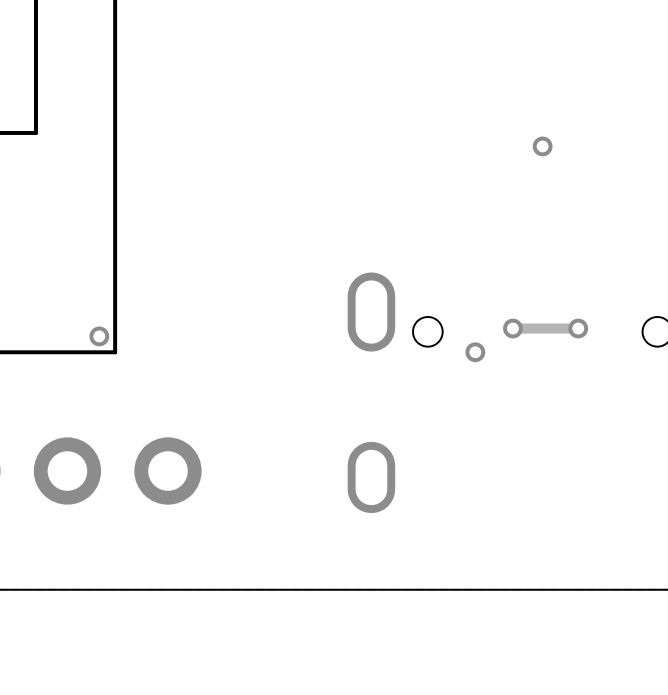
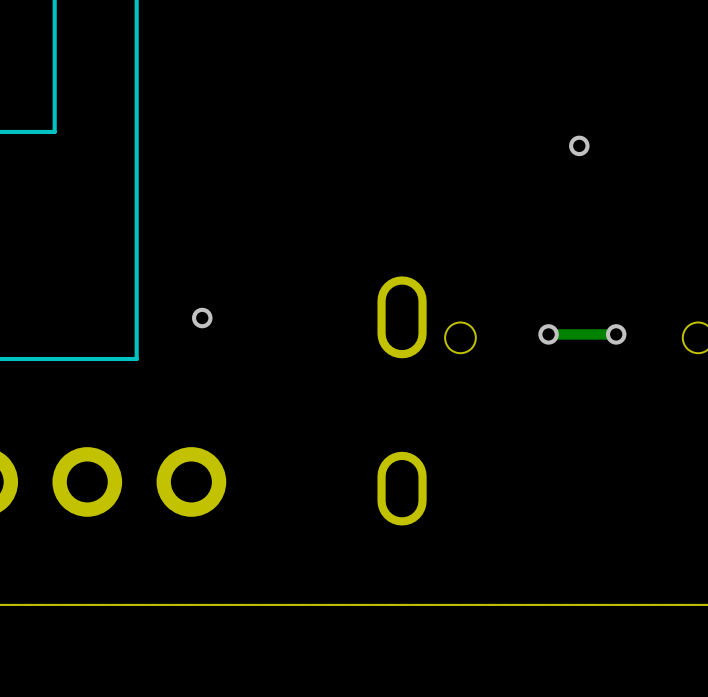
via position: (99, 336) -> (202, 318)
via: (475, 352) -> none

